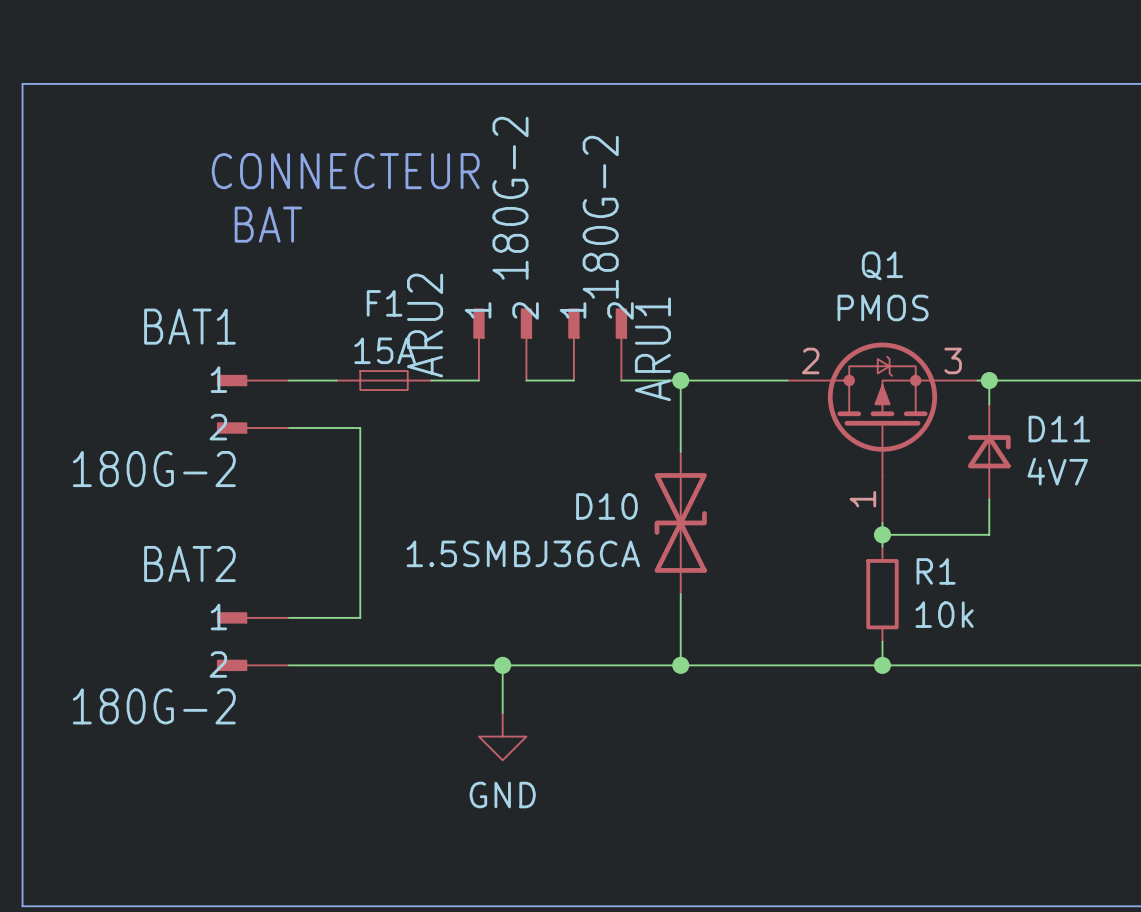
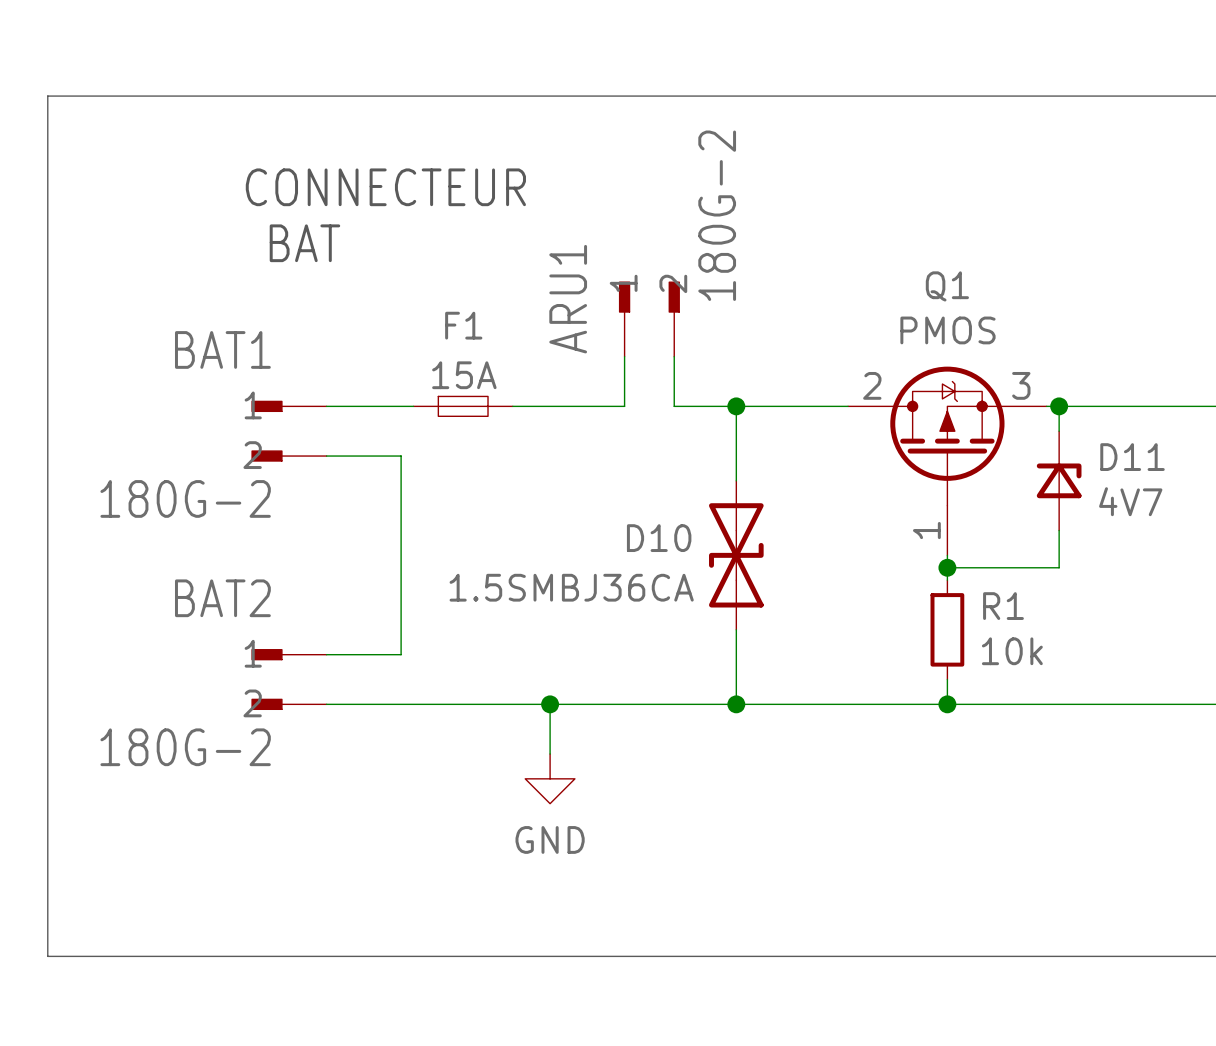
ARU1 value position: 180G-2 (600, 217) -> 180G-2 (717, 215)
ARU2: 180G-2 (502, 344) -> none
ARU1 position: (597, 344) -> (649, 319)
ARU1 name position: ARU1 (652, 349) -> ARU1 (568, 299)
F1 position: (384, 380) -> (463, 406)
wire: none -> (525, 406) (574, 406)

